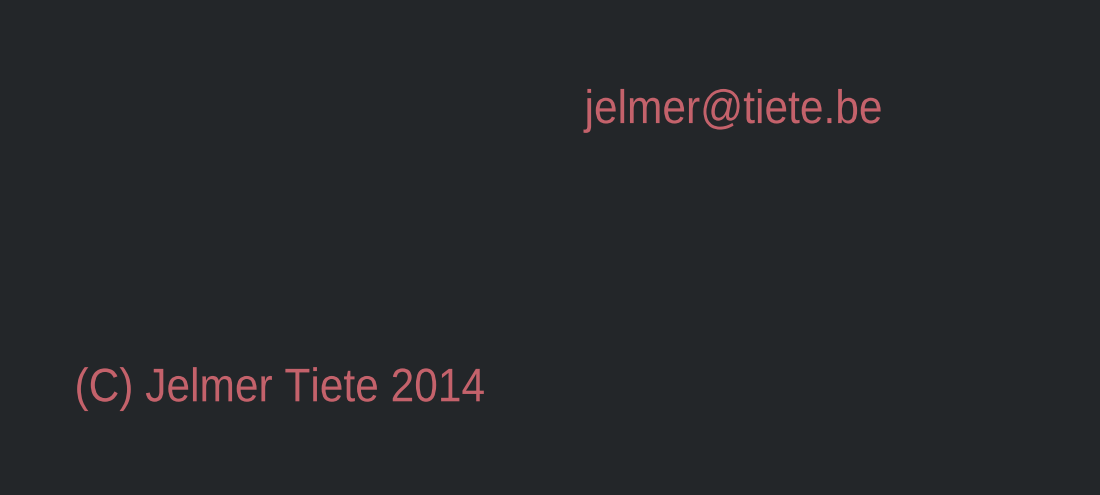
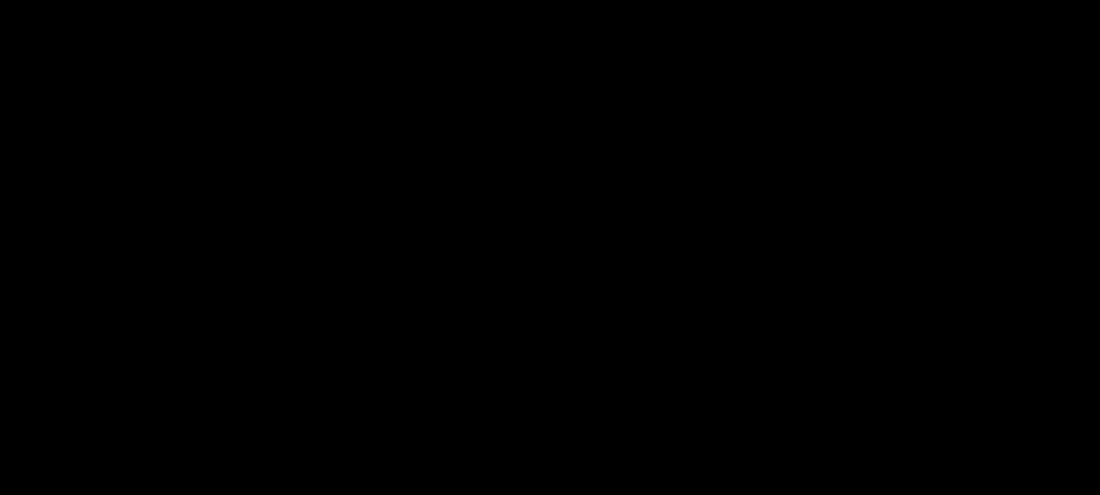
text: jelmer@tiete.be (732, 110) -> none
text: (C) Jelmer Tiete 2014 (280, 389) -> none

